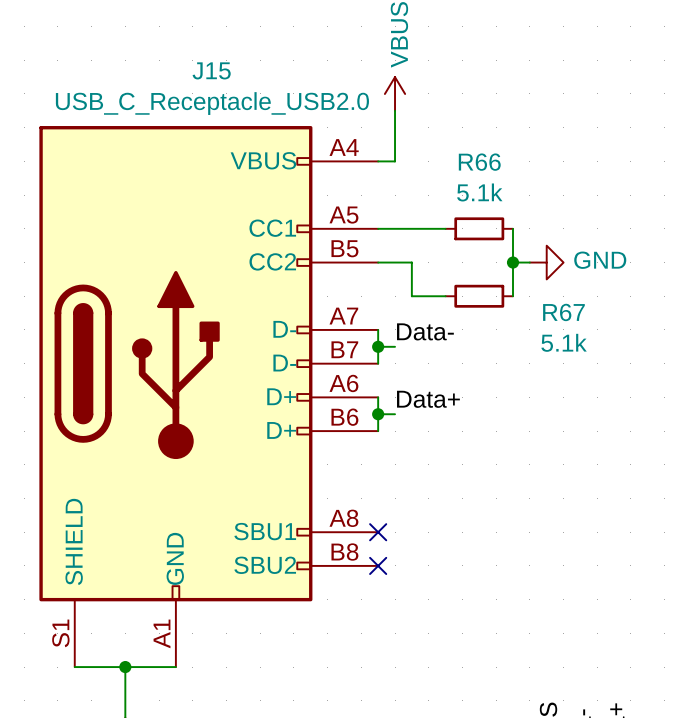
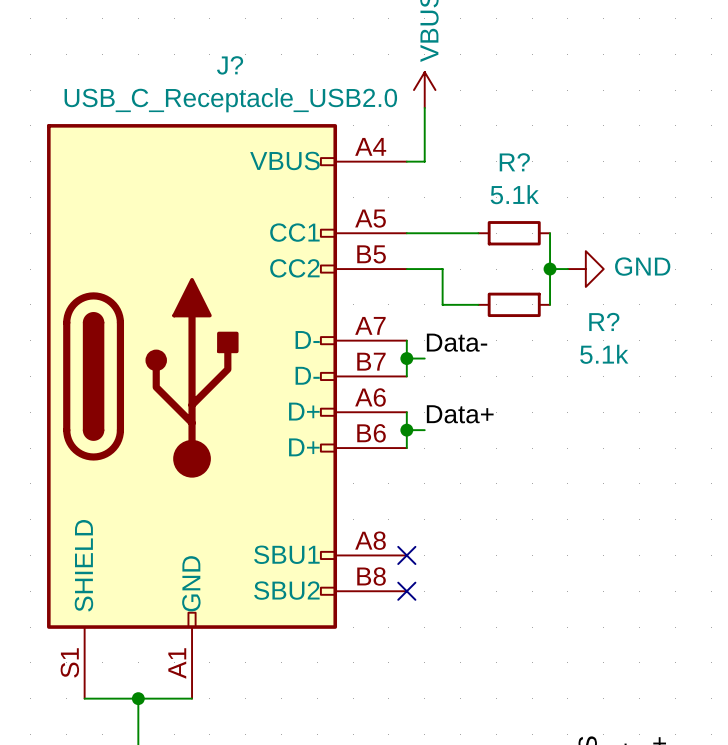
R66 name: R66 (479, 162) -> R? (514, 162)
R67 name: R67 (563, 312) -> R? (604, 321)
J15: USB_C_Receptacle_USB2.0 (208, 396) -> none
J?: none -> USB_C_Receptacle_USB2.0 (226, 411)

